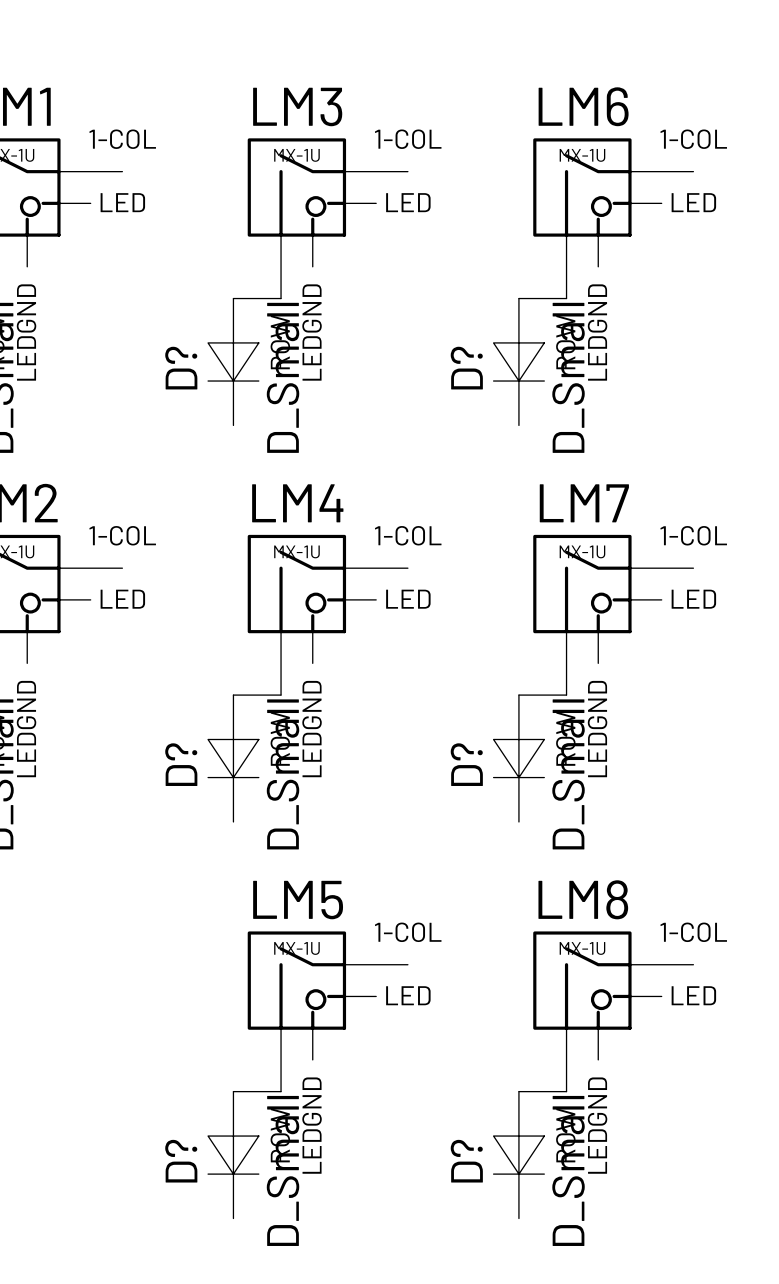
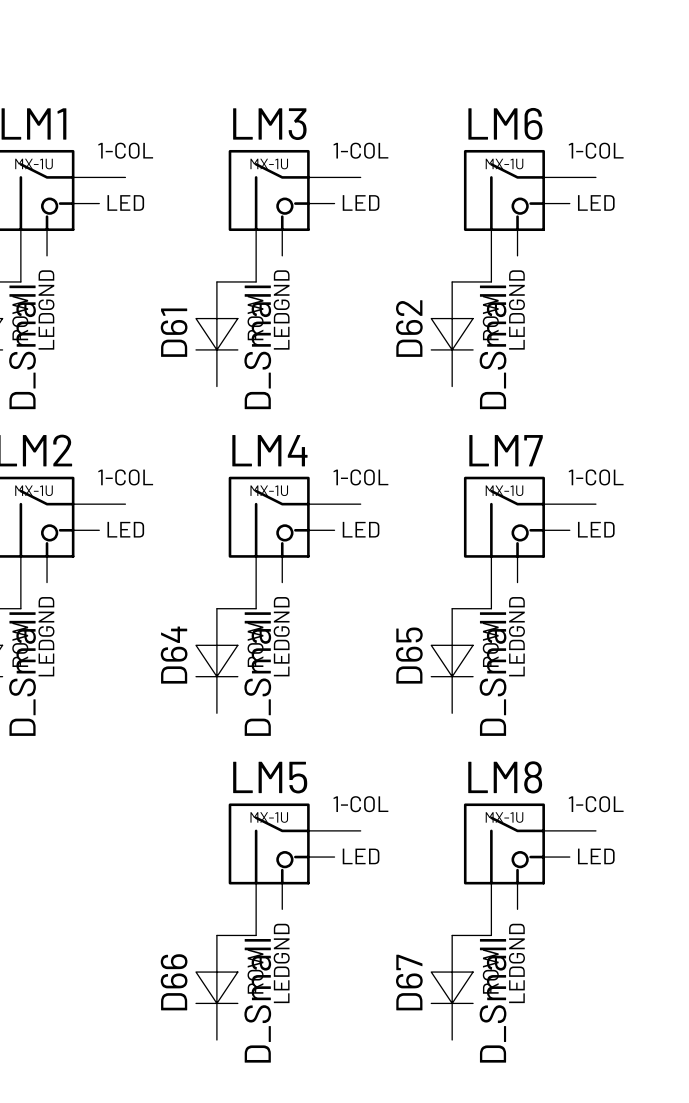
D? name: D? (181, 368) -> D61 (174, 332)
D? name: D? (466, 368) -> D62 (409, 328)
D? name: D? (181, 764) -> D64 (174, 655)
D? name: D? (466, 764) -> D65 (409, 655)
D? name: D? (181, 1161) -> D66 (174, 982)
D? name: D? (466, 1161) -> D67 (409, 982)

